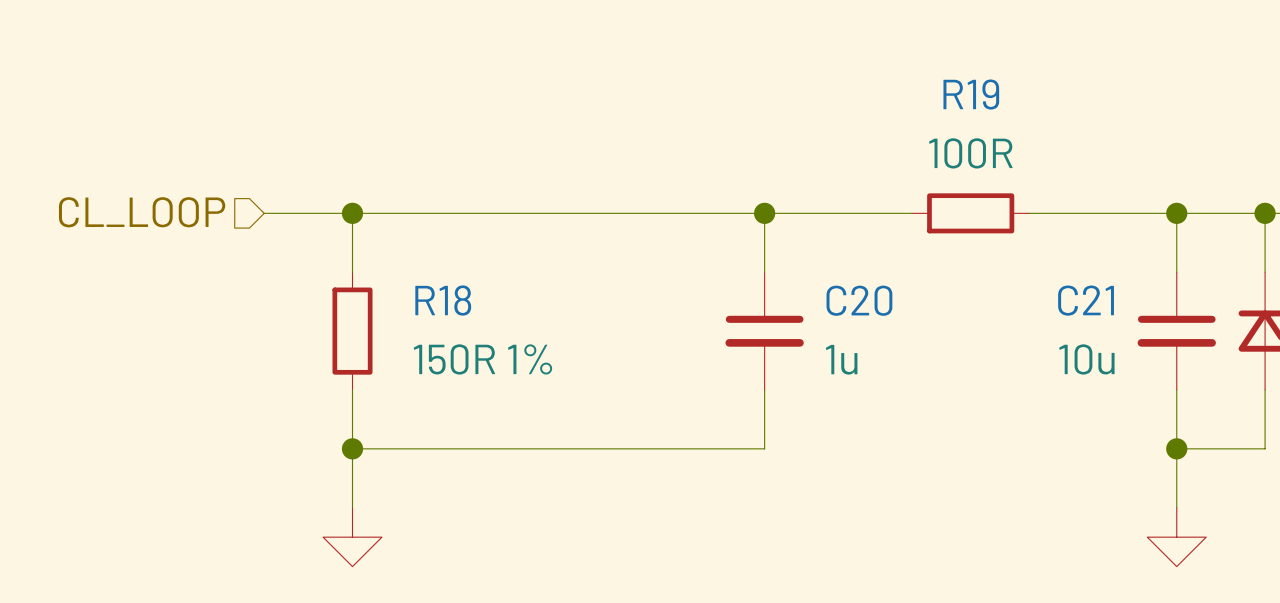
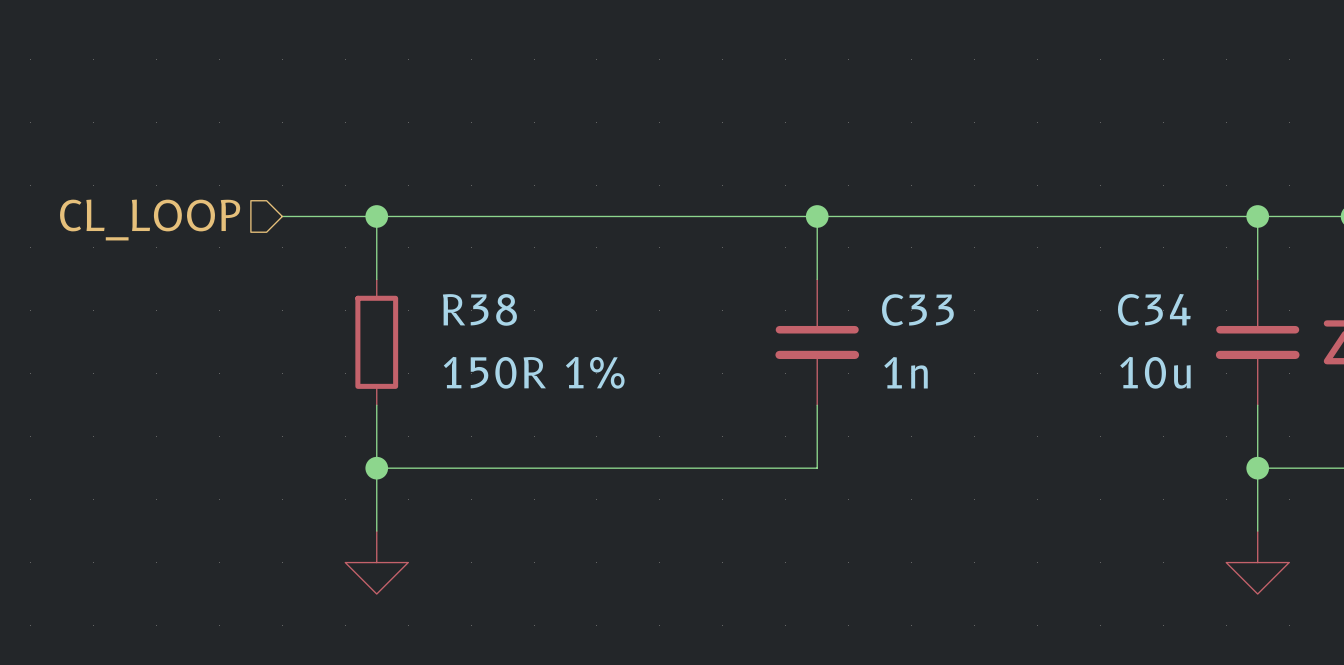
wire: none -> (974, 216) (1100, 216)
R19: 100R (970, 213) -> none
R18 name: R18 (443, 300) -> R38 (479, 309)
C20 name: C20 (859, 300) -> C33 (917, 310)
C21 name: C21 (1086, 300) -> C34 (1154, 309)
C20 value: 1u (841, 359) -> 1n (905, 372)

